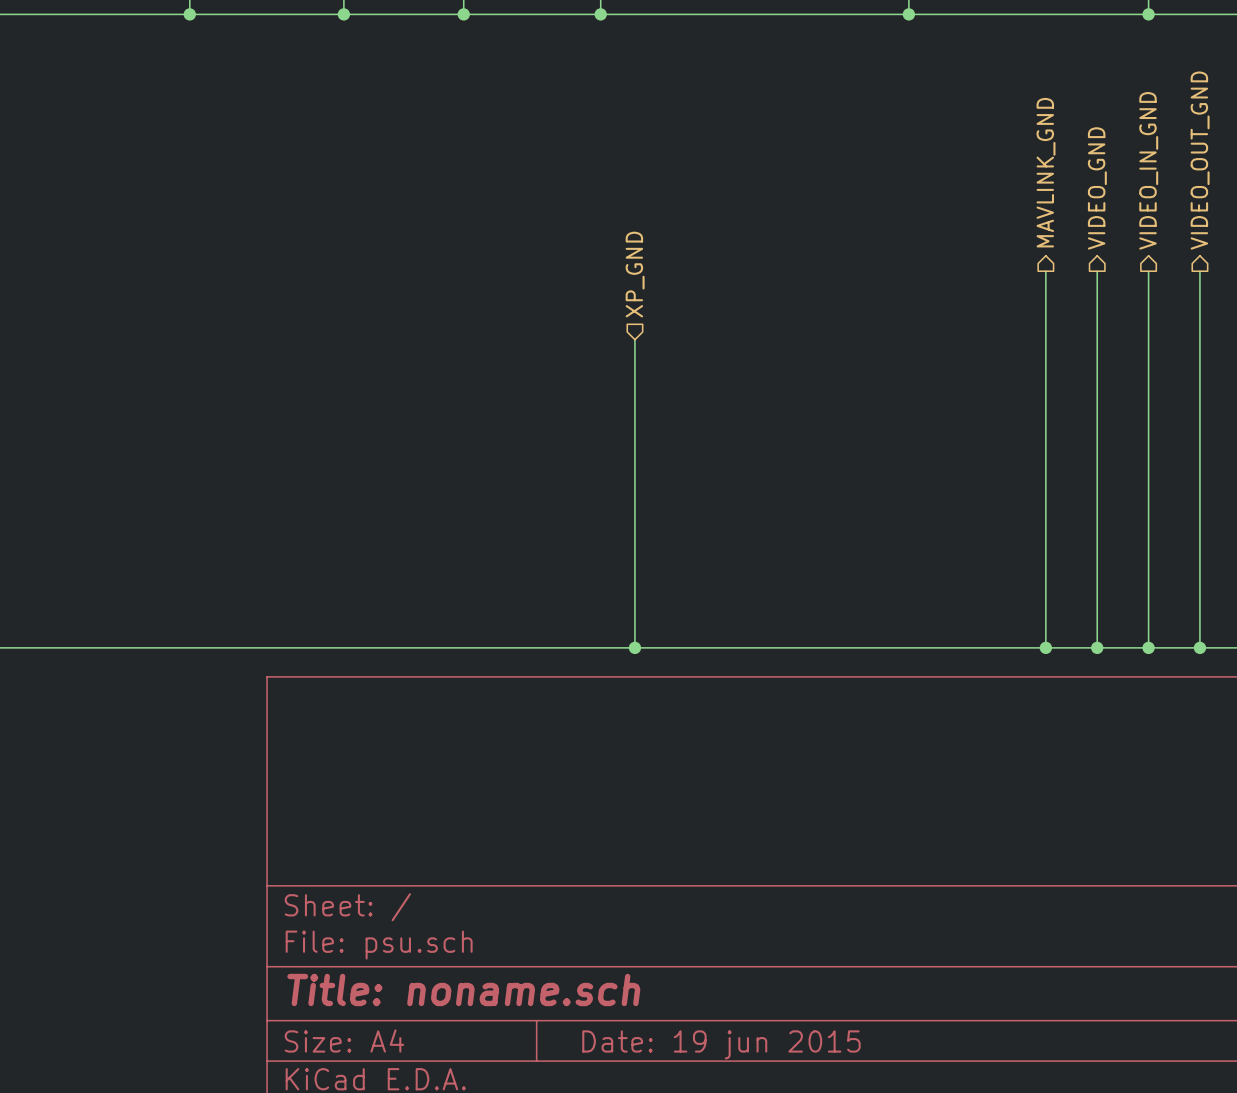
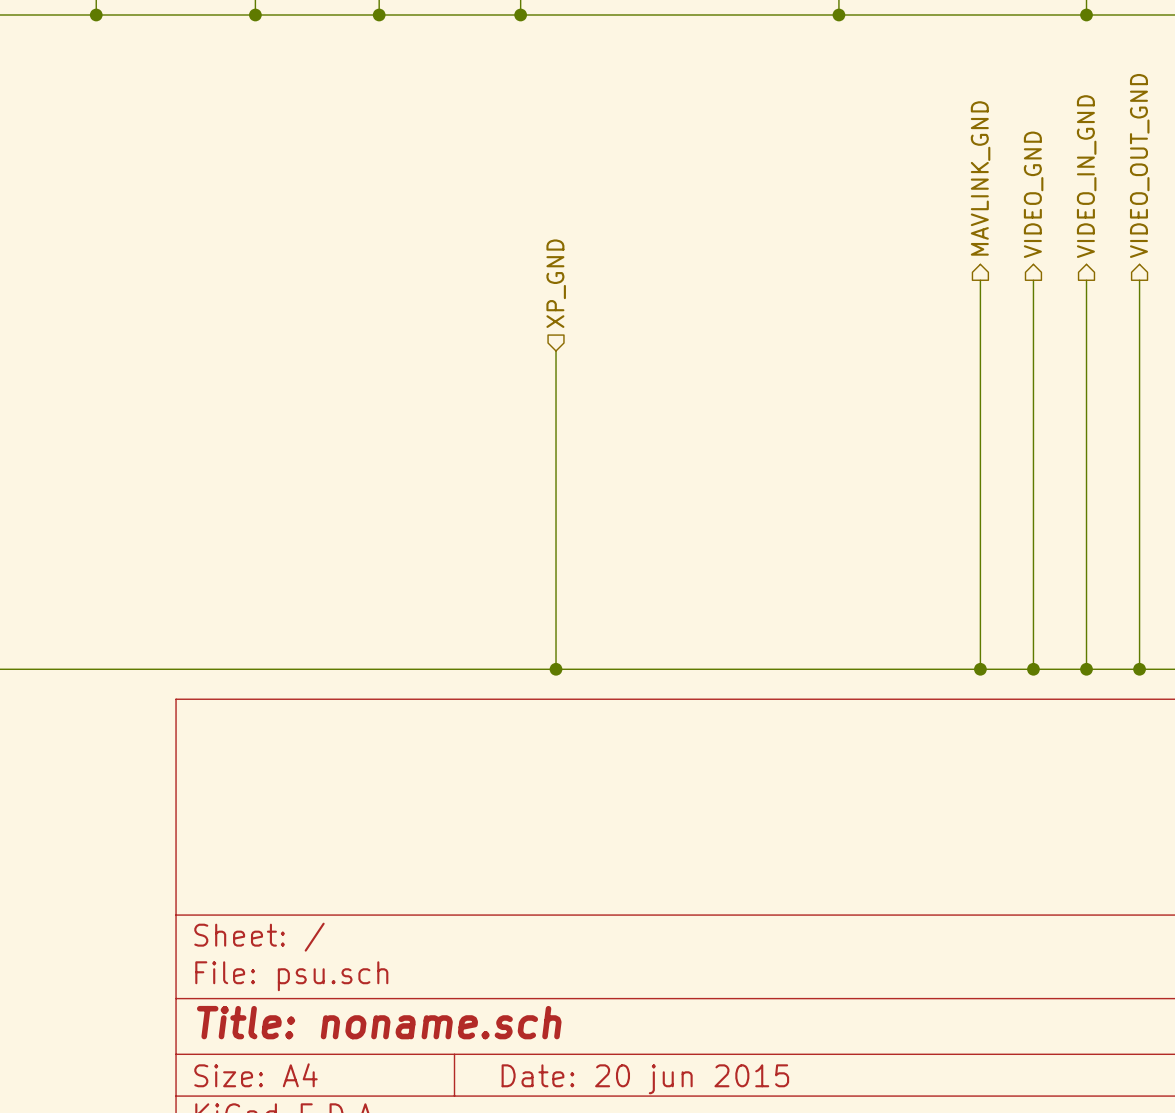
title block: Date: 19 jun 2015 (721, 1044) -> Date: 20 jun 2015 (645, 1079)

